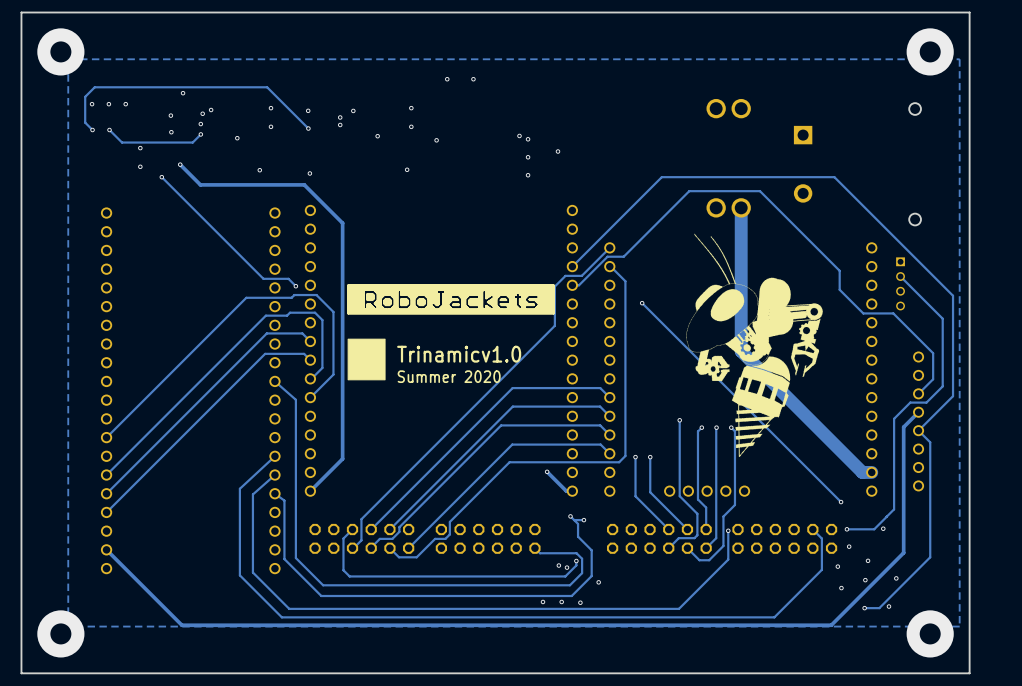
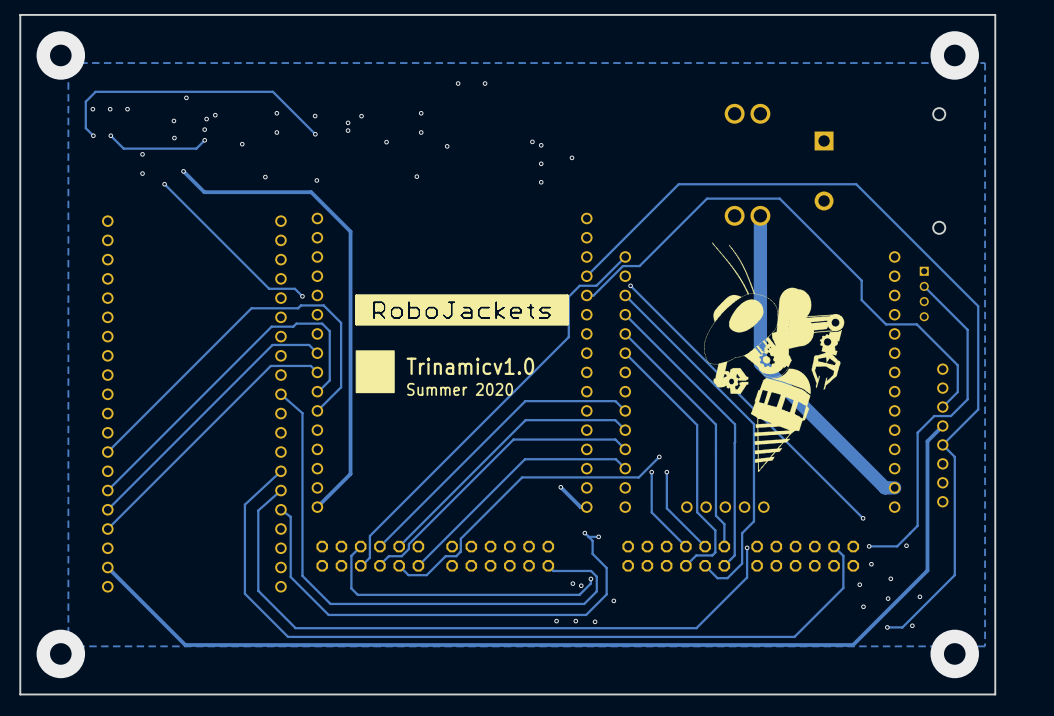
track: (609, 266) (625, 281) (625, 456) (619, 462) -> (659, 456) (638, 477) (634, 477)
track: none -> (630, 285) (658, 313)
via position: (642, 303) -> (630, 285)
track: none -> (625, 314) (735, 424) (735, 441)
track: none -> (625, 353) (697, 425) (697, 434)
via: (679, 420) -> none
track: (701, 427) (697, 431) -> (625, 333) (715, 424) (715, 445)
via: (701, 427) -> none
via: (716, 427) -> none
track: (731, 427) (734, 431) -> (625, 295) (753, 424) (753, 445)
via: (731, 427) -> none
via: none -> (659, 456)

